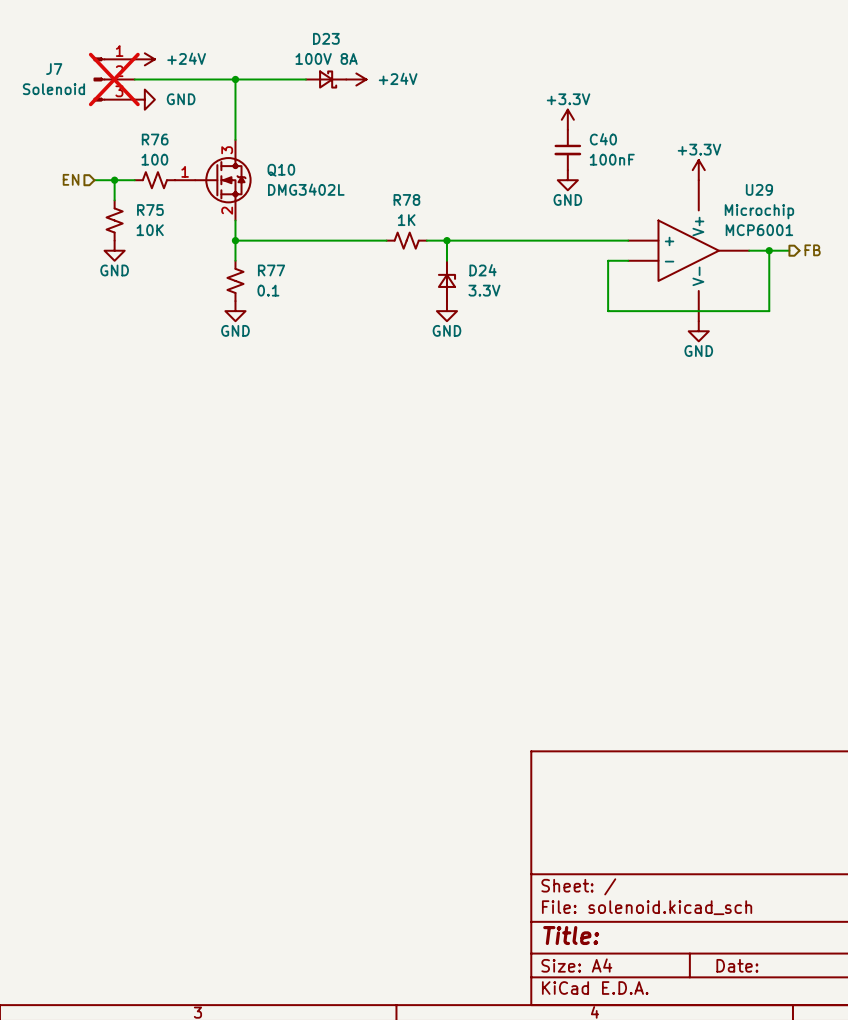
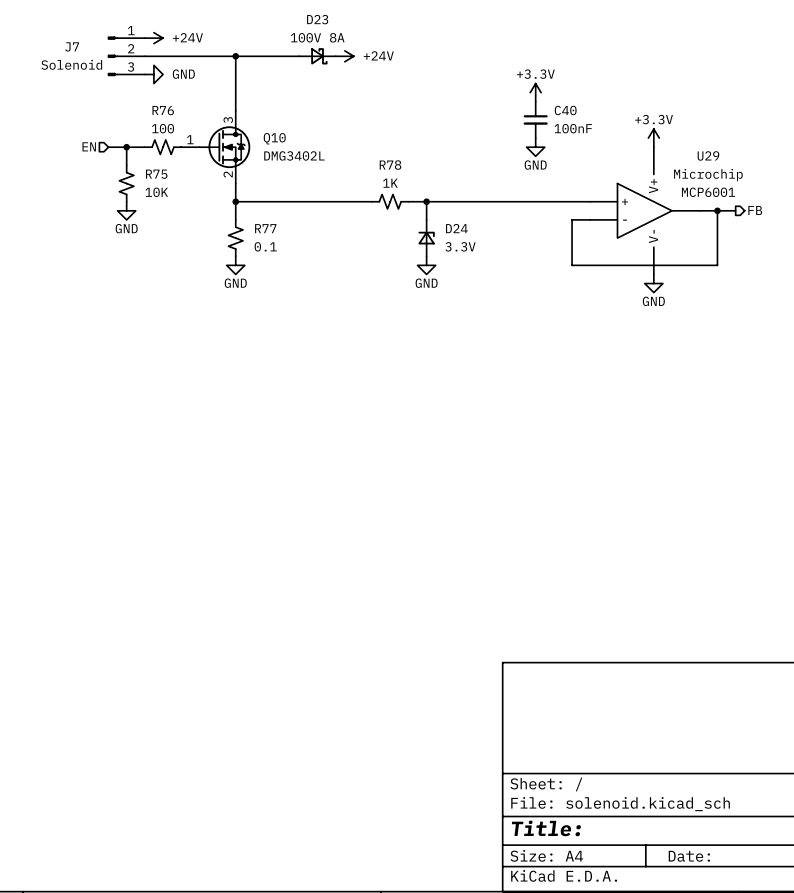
J7 do-not-place cross: (114, 79) -> none

